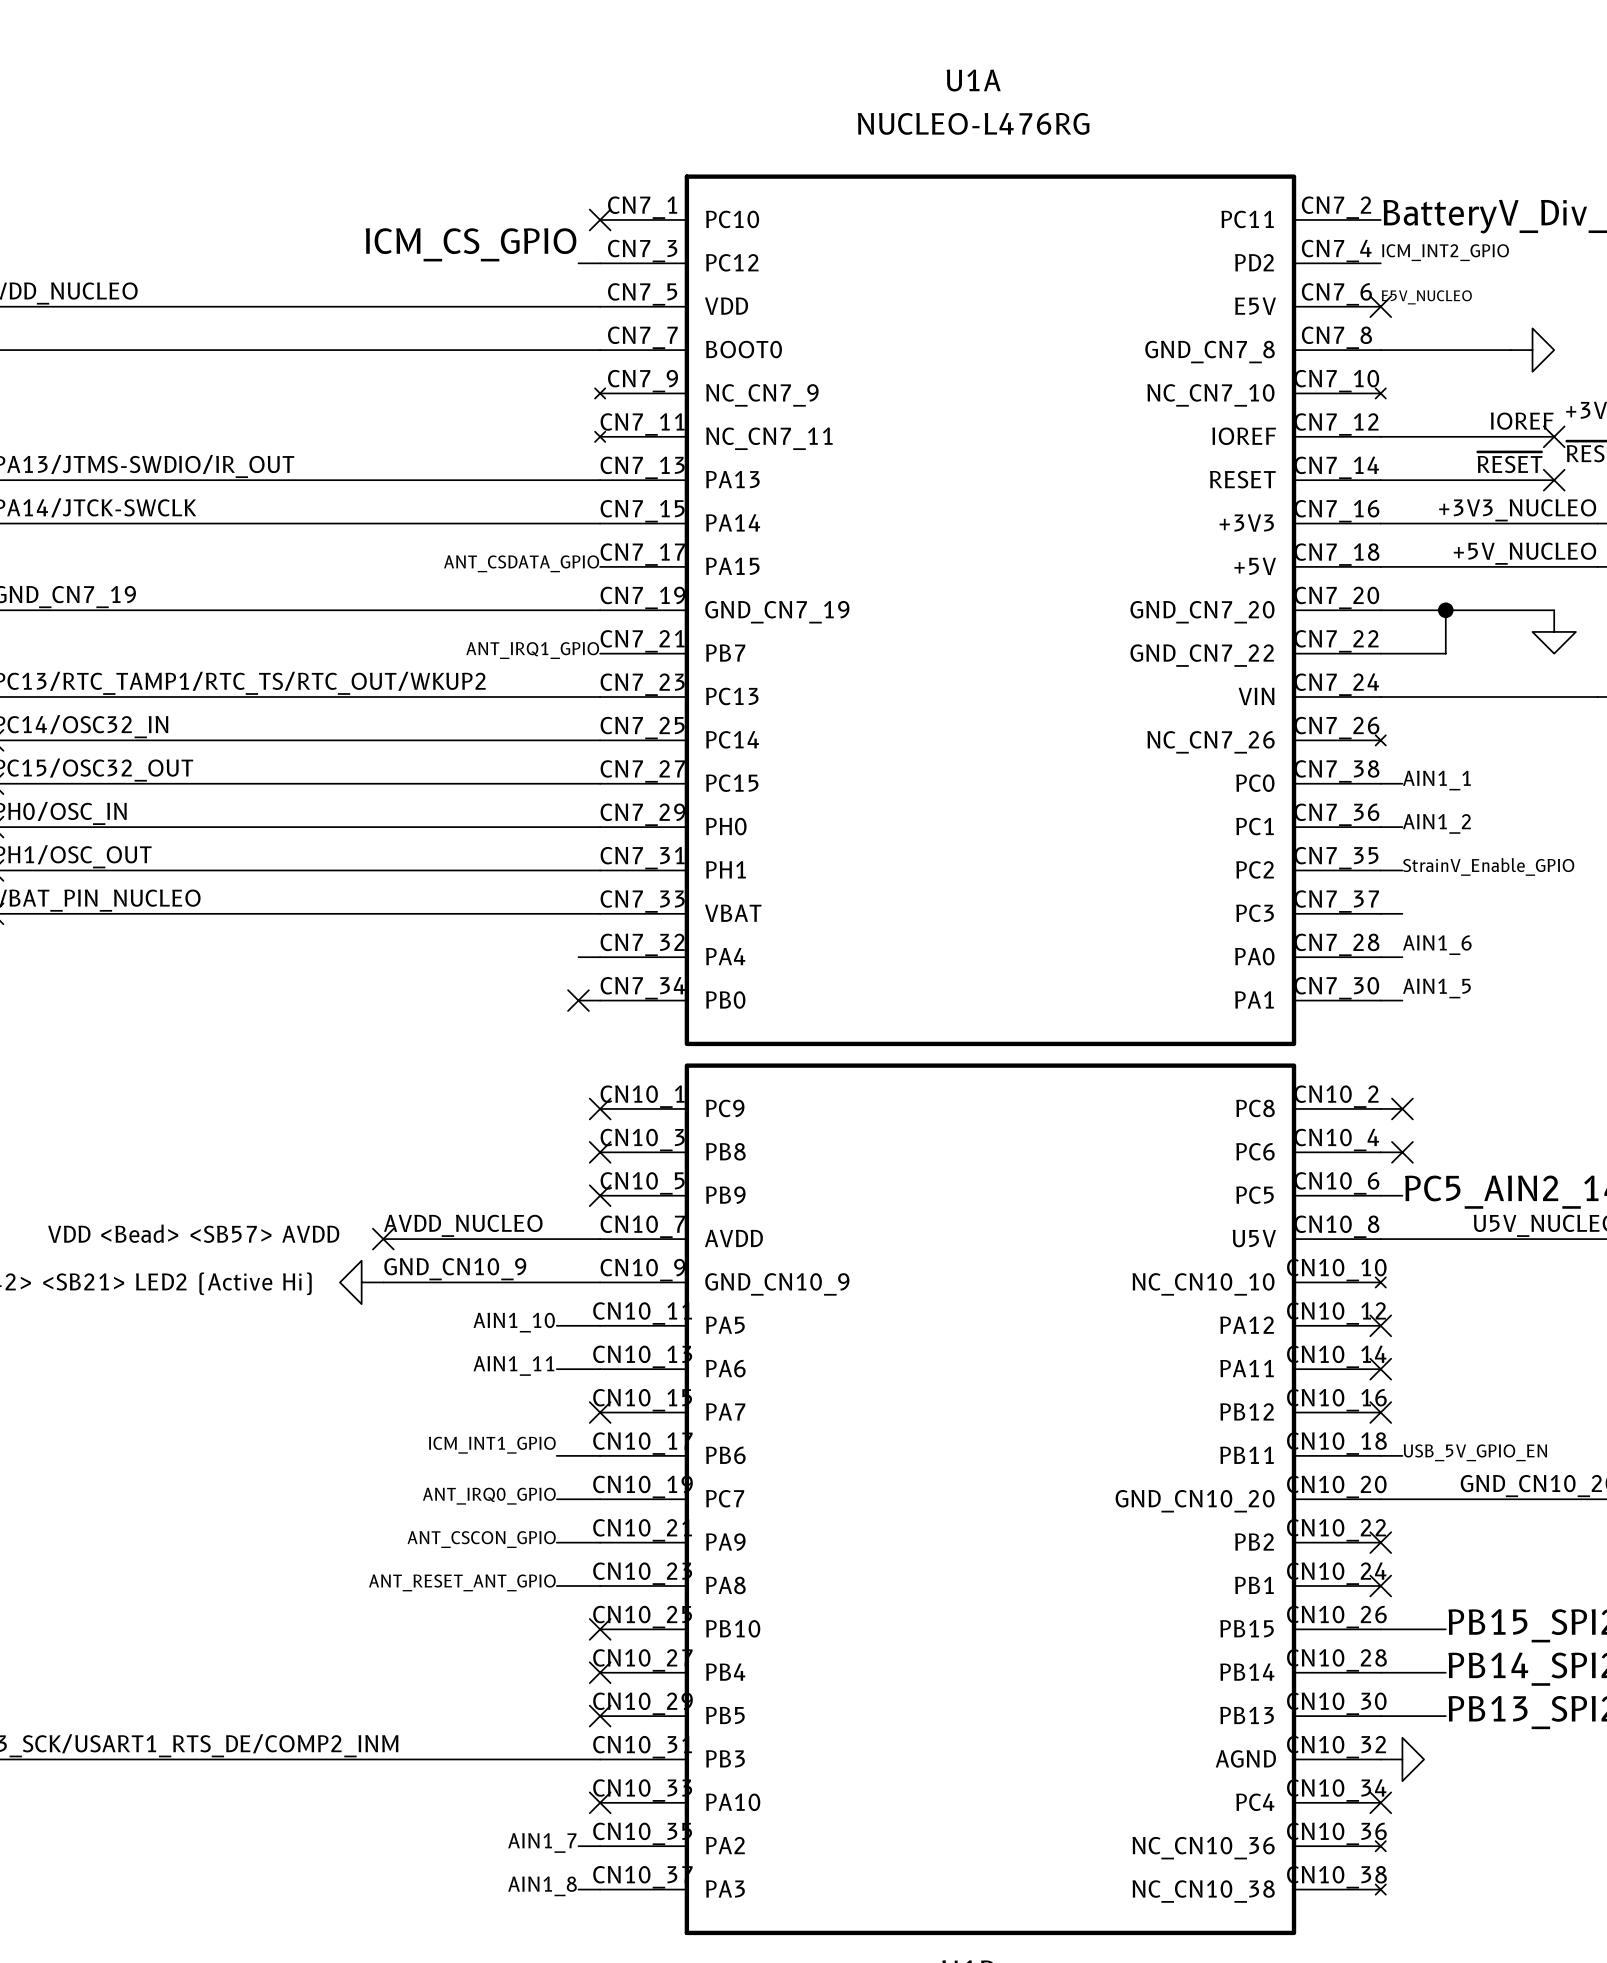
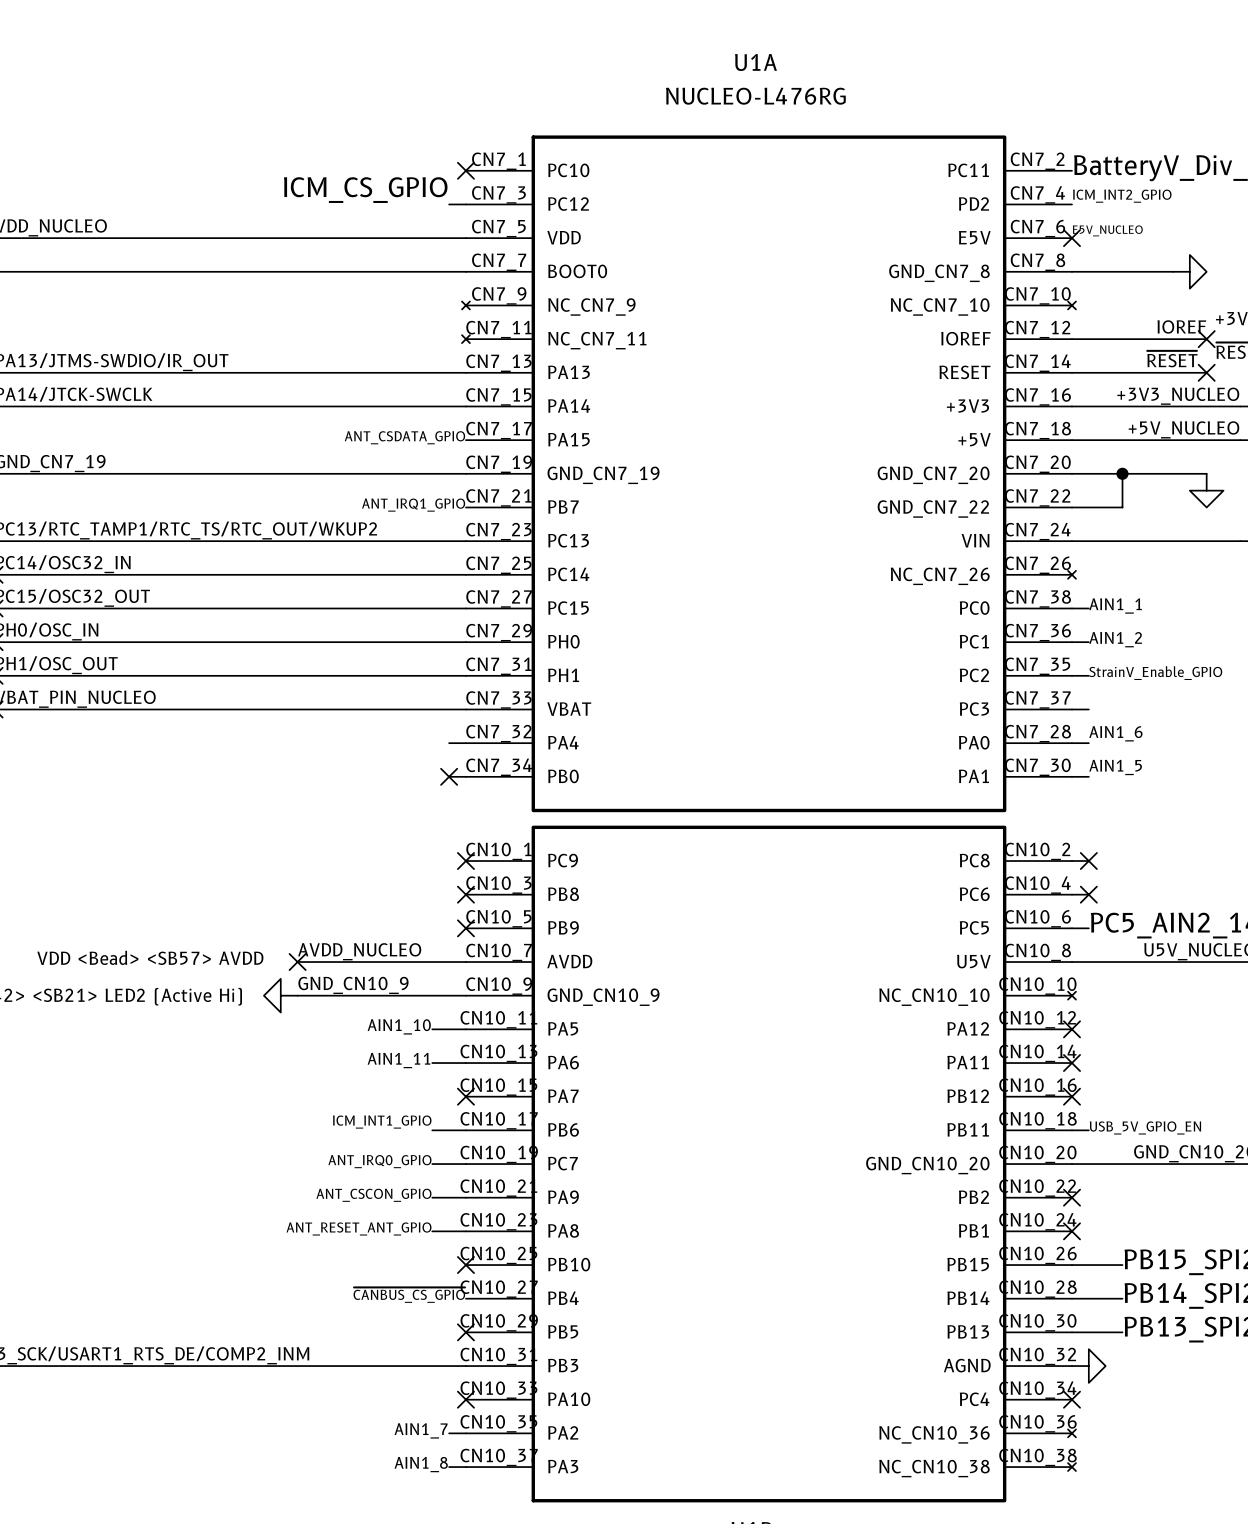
label: none -> ~{CANBUS_CS_GPIO} (409, 1295)
no-connect mark: (600, 1672) -> none

